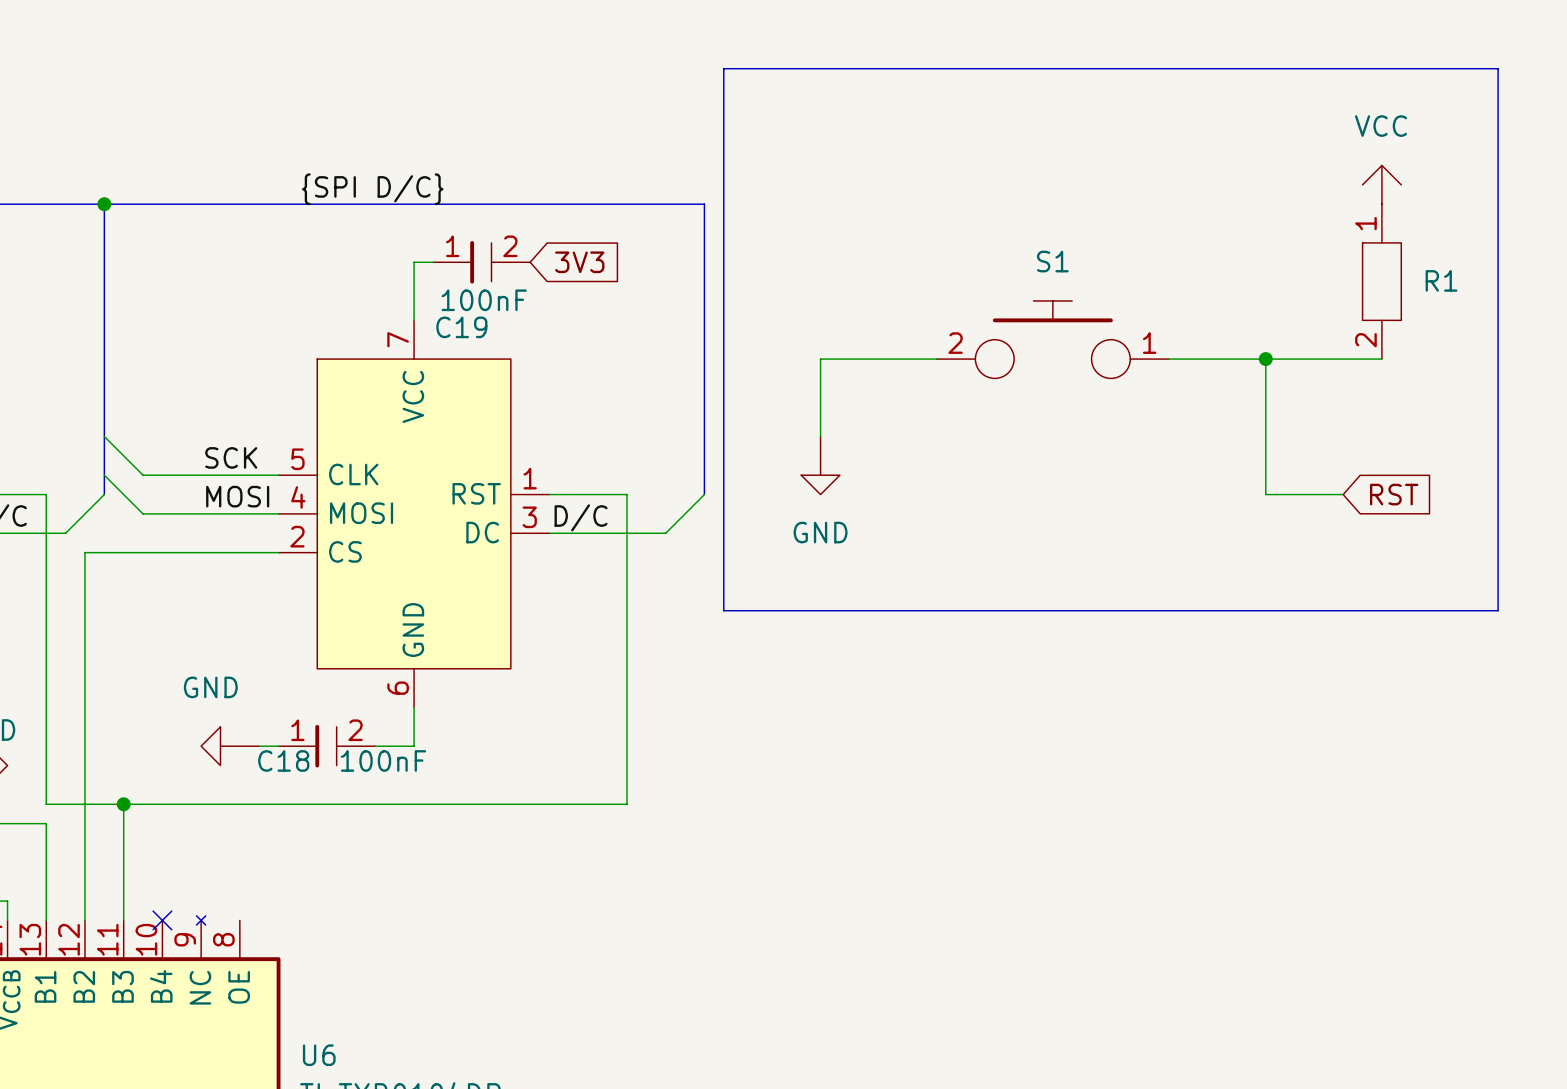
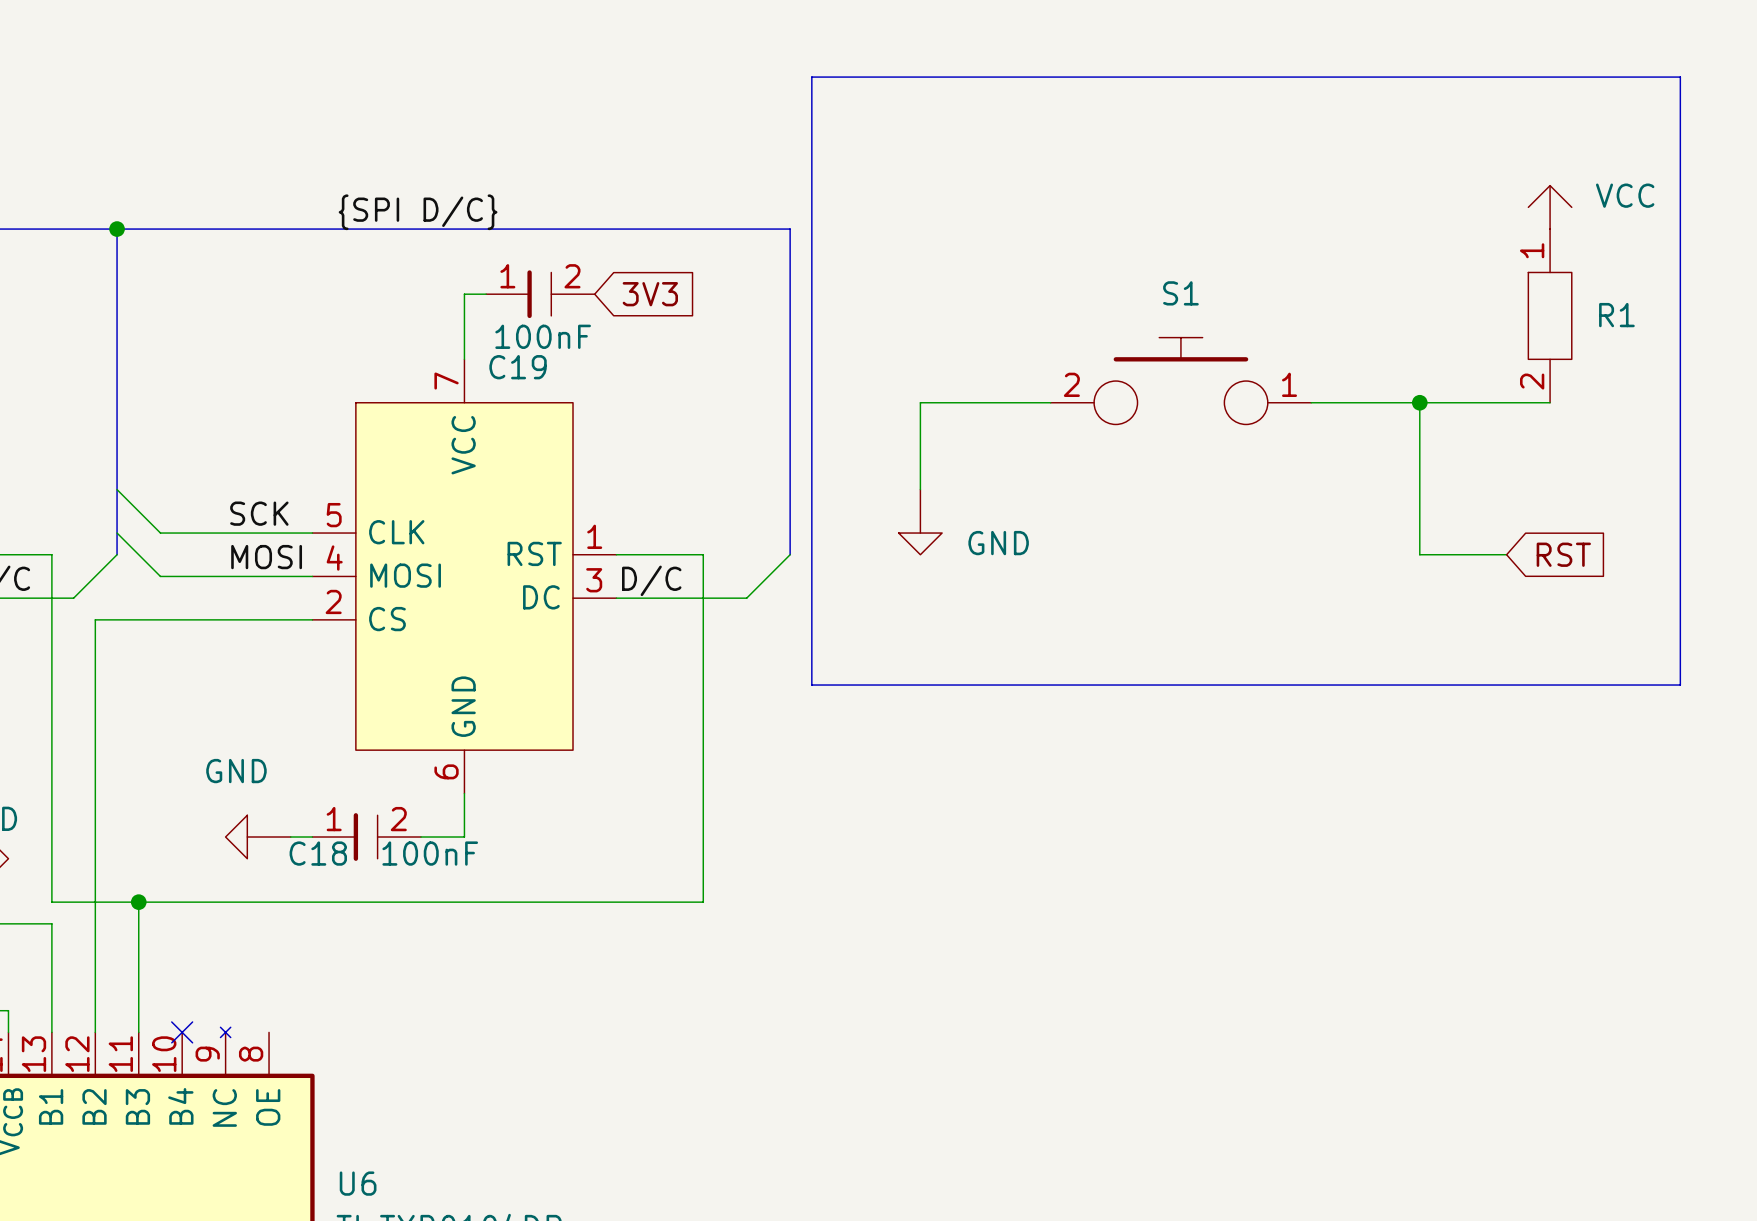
power symbol text position: VCC (1381, 126) -> VCC (1625, 195)
power symbol text position: GND (820, 532) -> GND (998, 543)

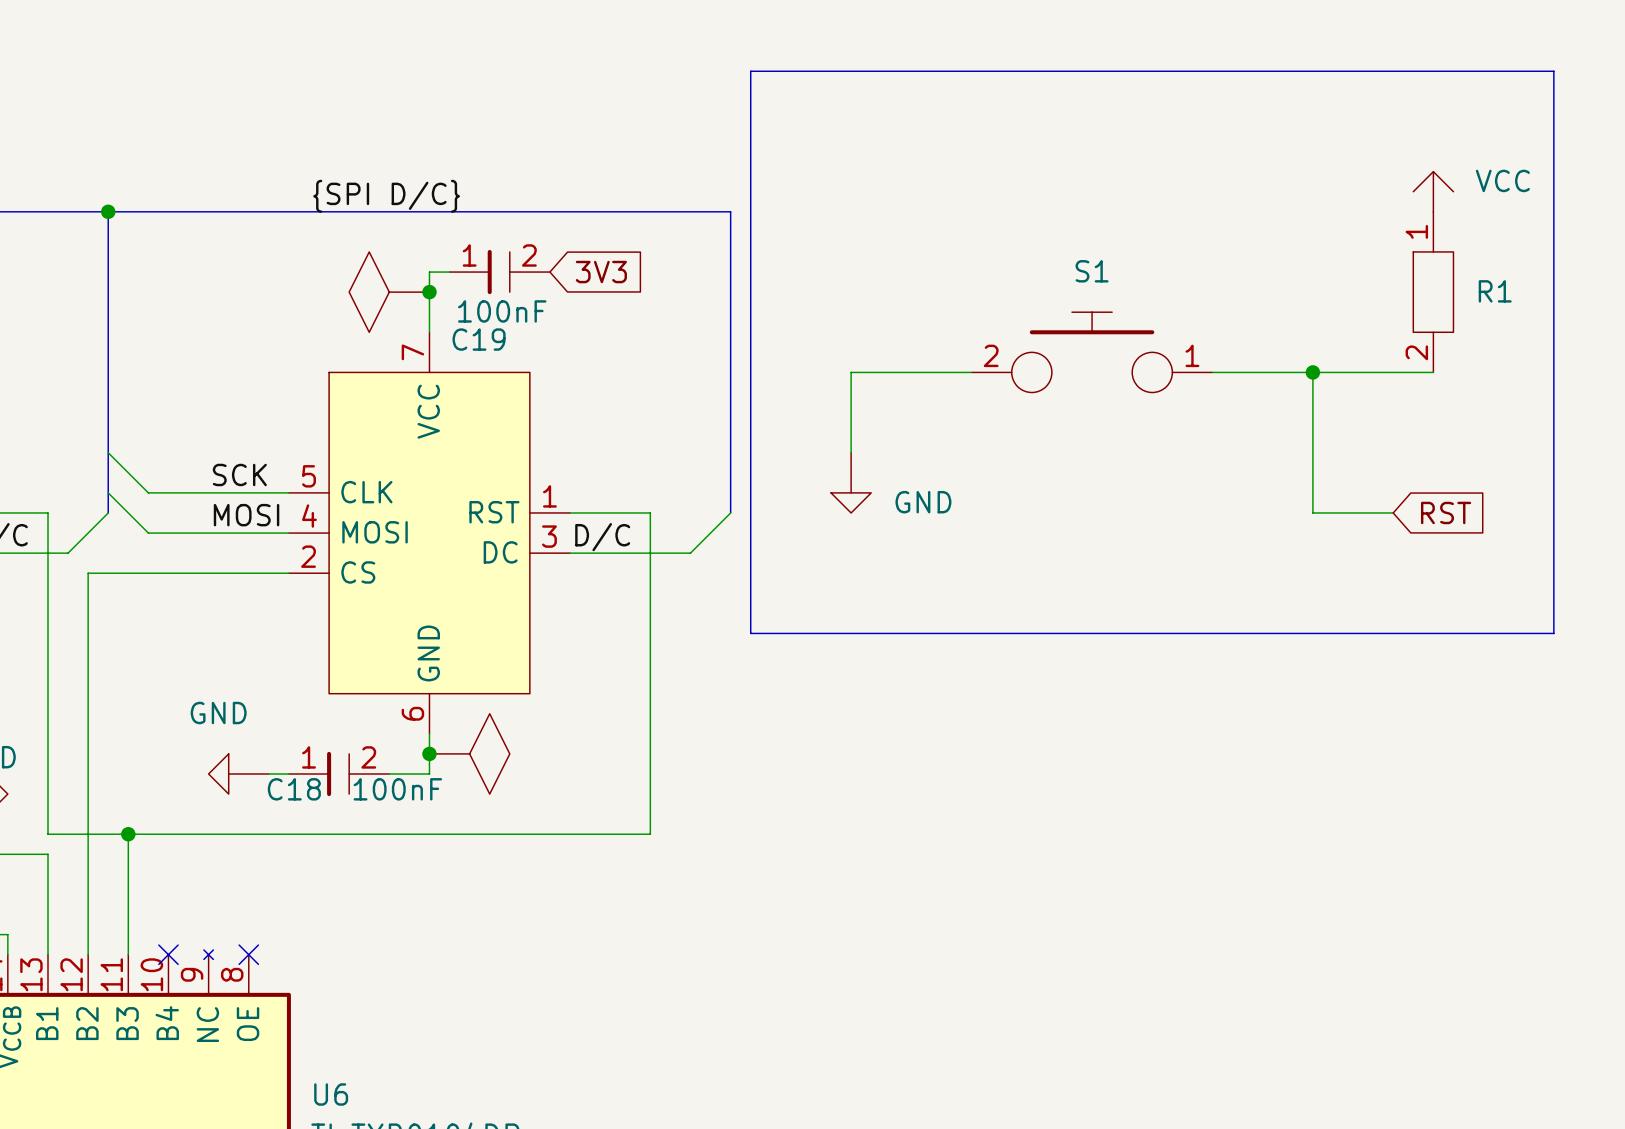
power symbol: none -> (389, 292)
junction: none -> (429, 292)
junction: none -> (429, 753)
power symbol: none -> (469, 753)
no-connect mark: none -> (248, 954)

